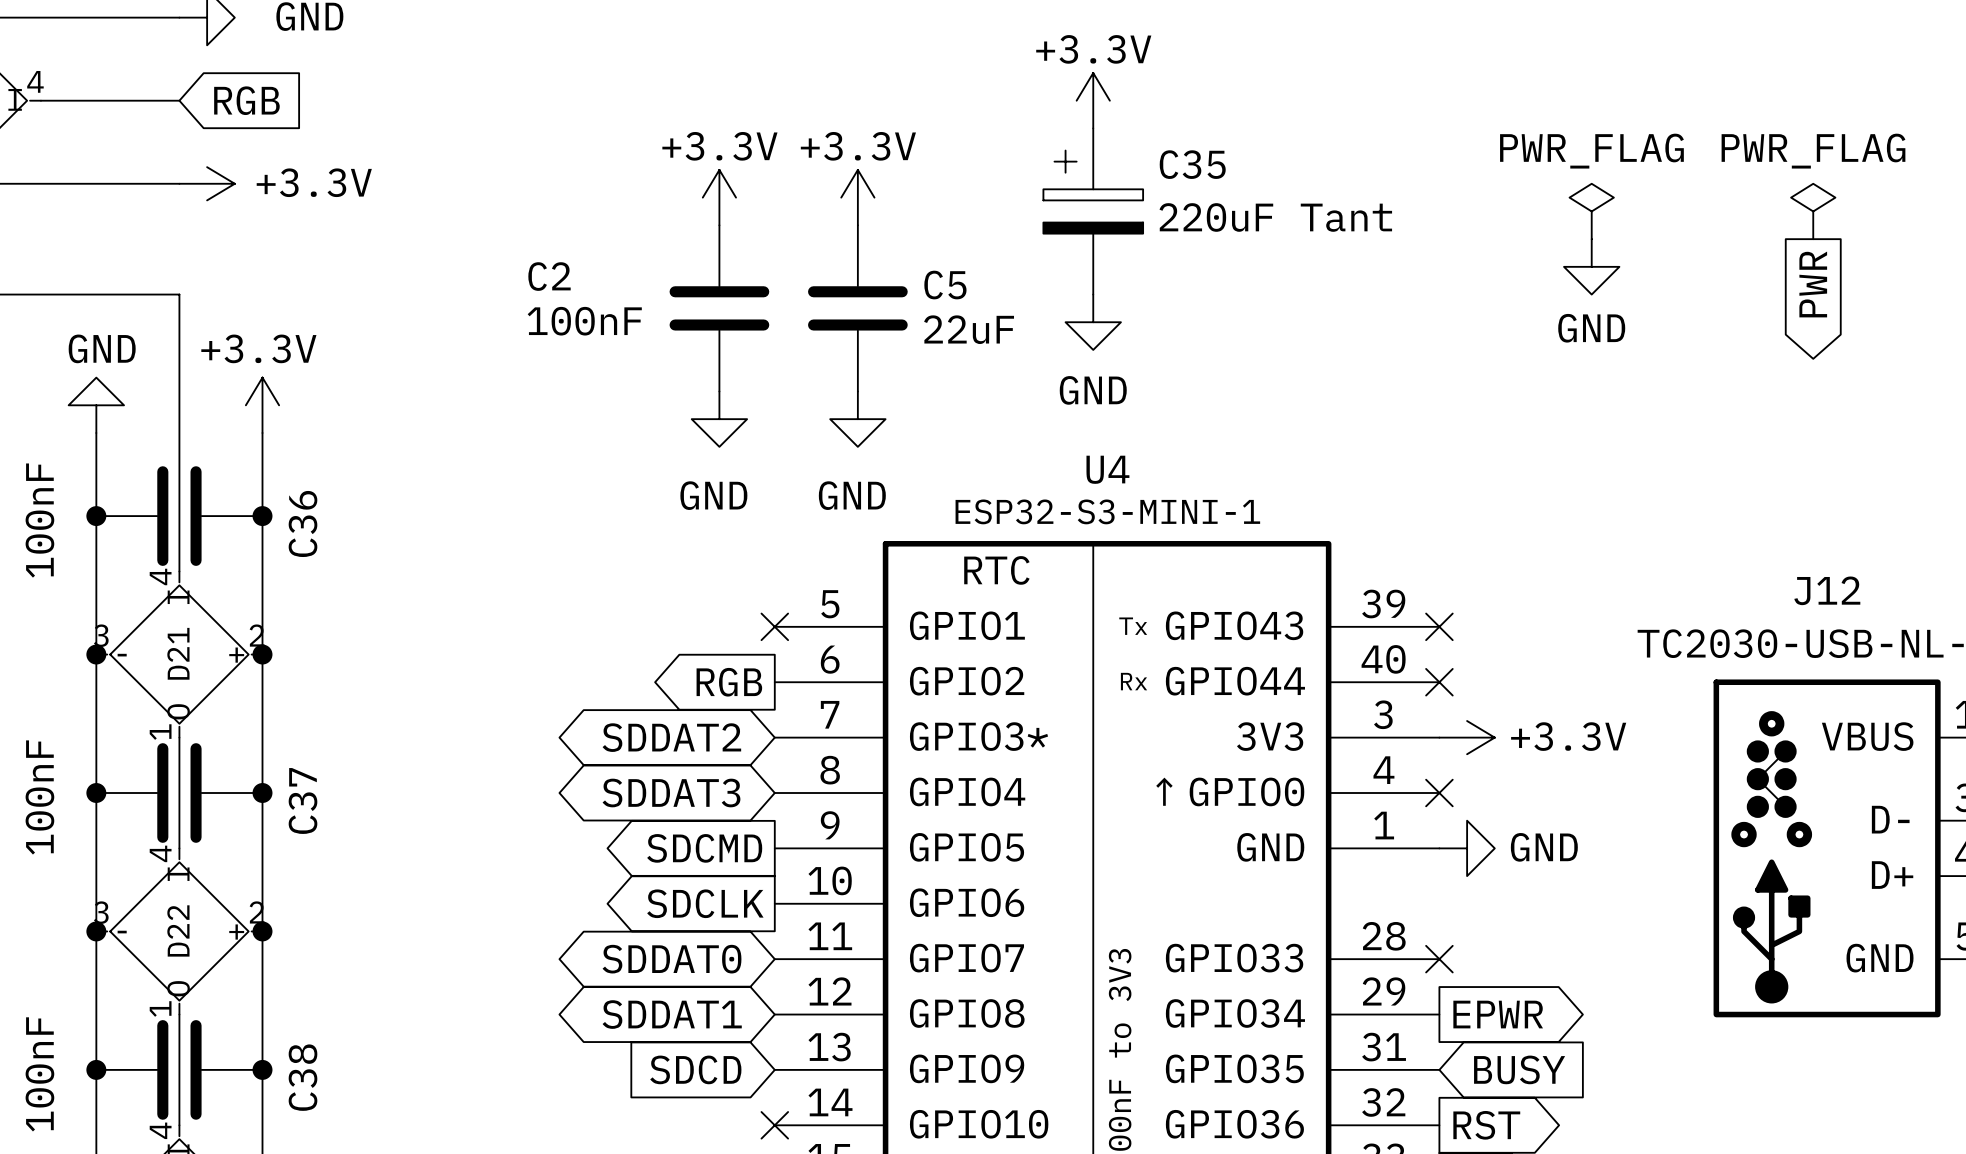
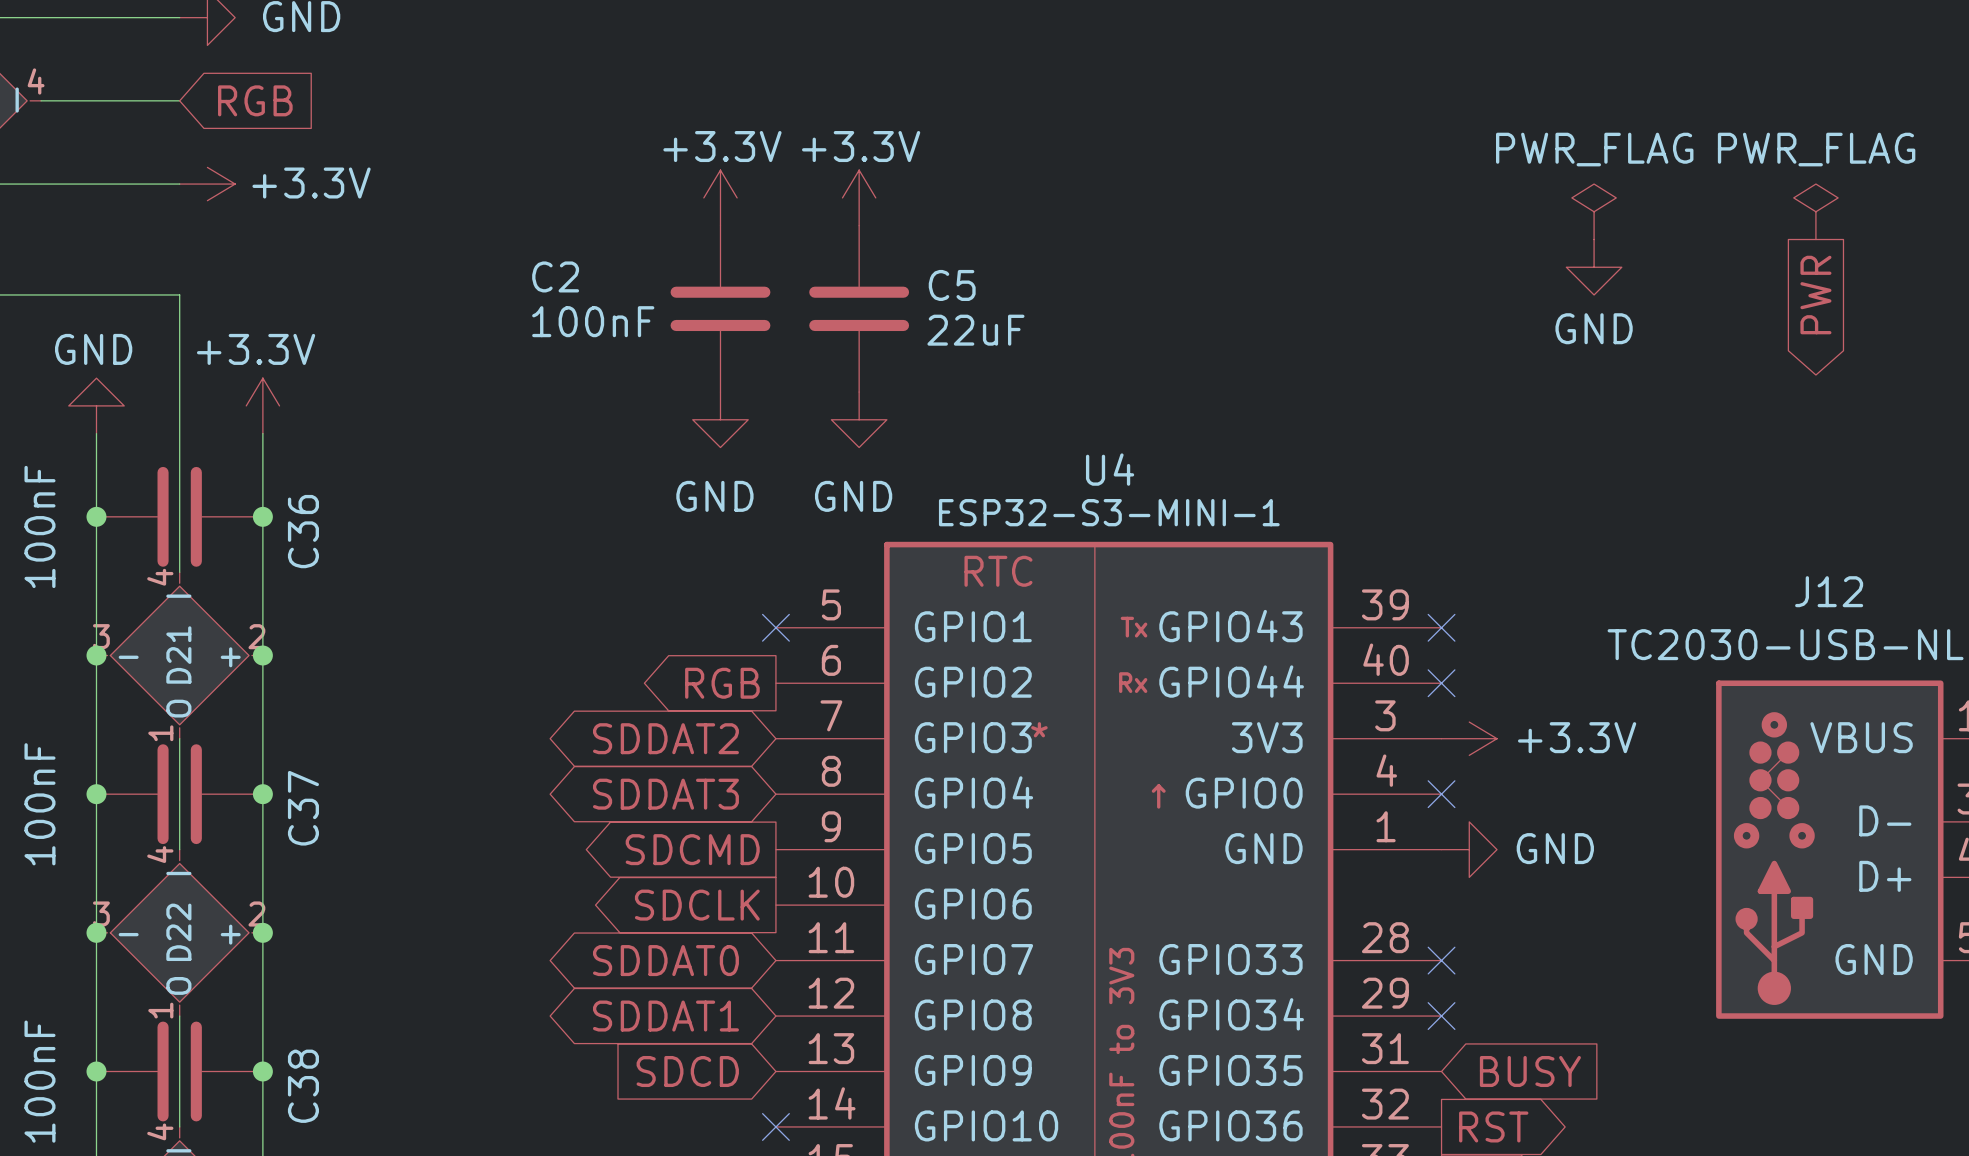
power symbol: +3.3V (1093, 100) -> none
C35: 220uF Tant (1093, 211) -> none
power symbol: GND (1093, 322) -> none
no-connect mark: none -> (1441, 1016)
global label: EPWR (1498, 1014) -> none

